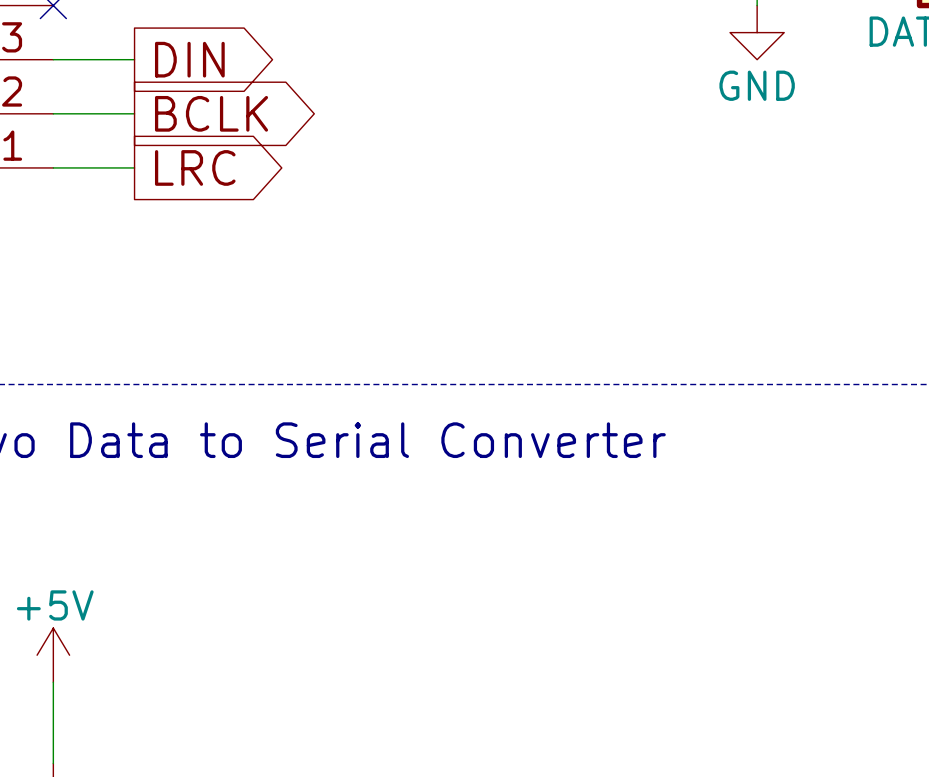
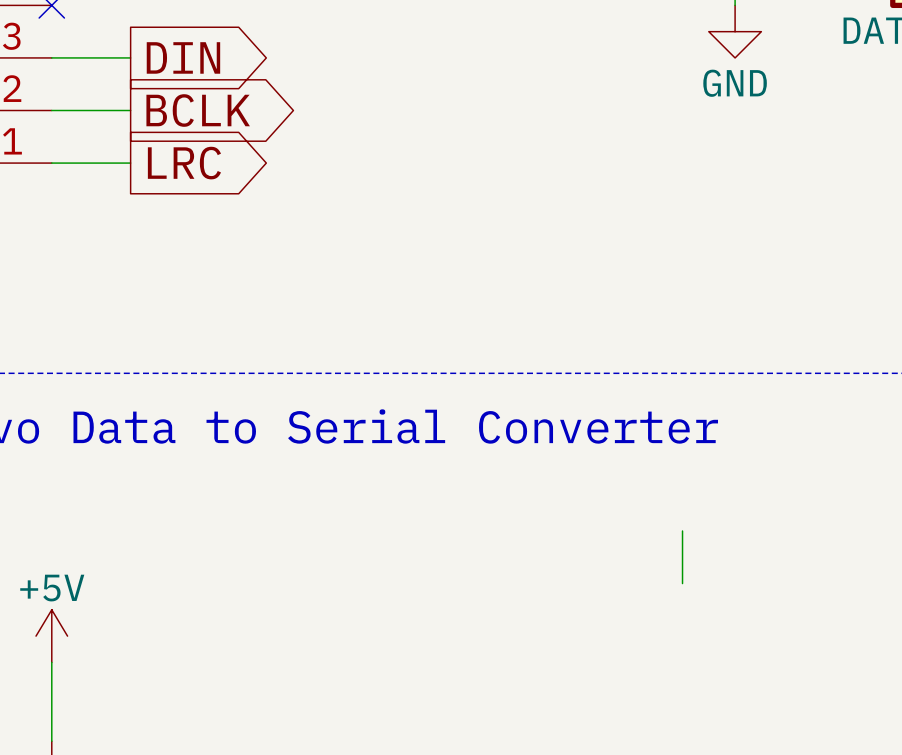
wire: none -> (682, 531) (682, 583)

